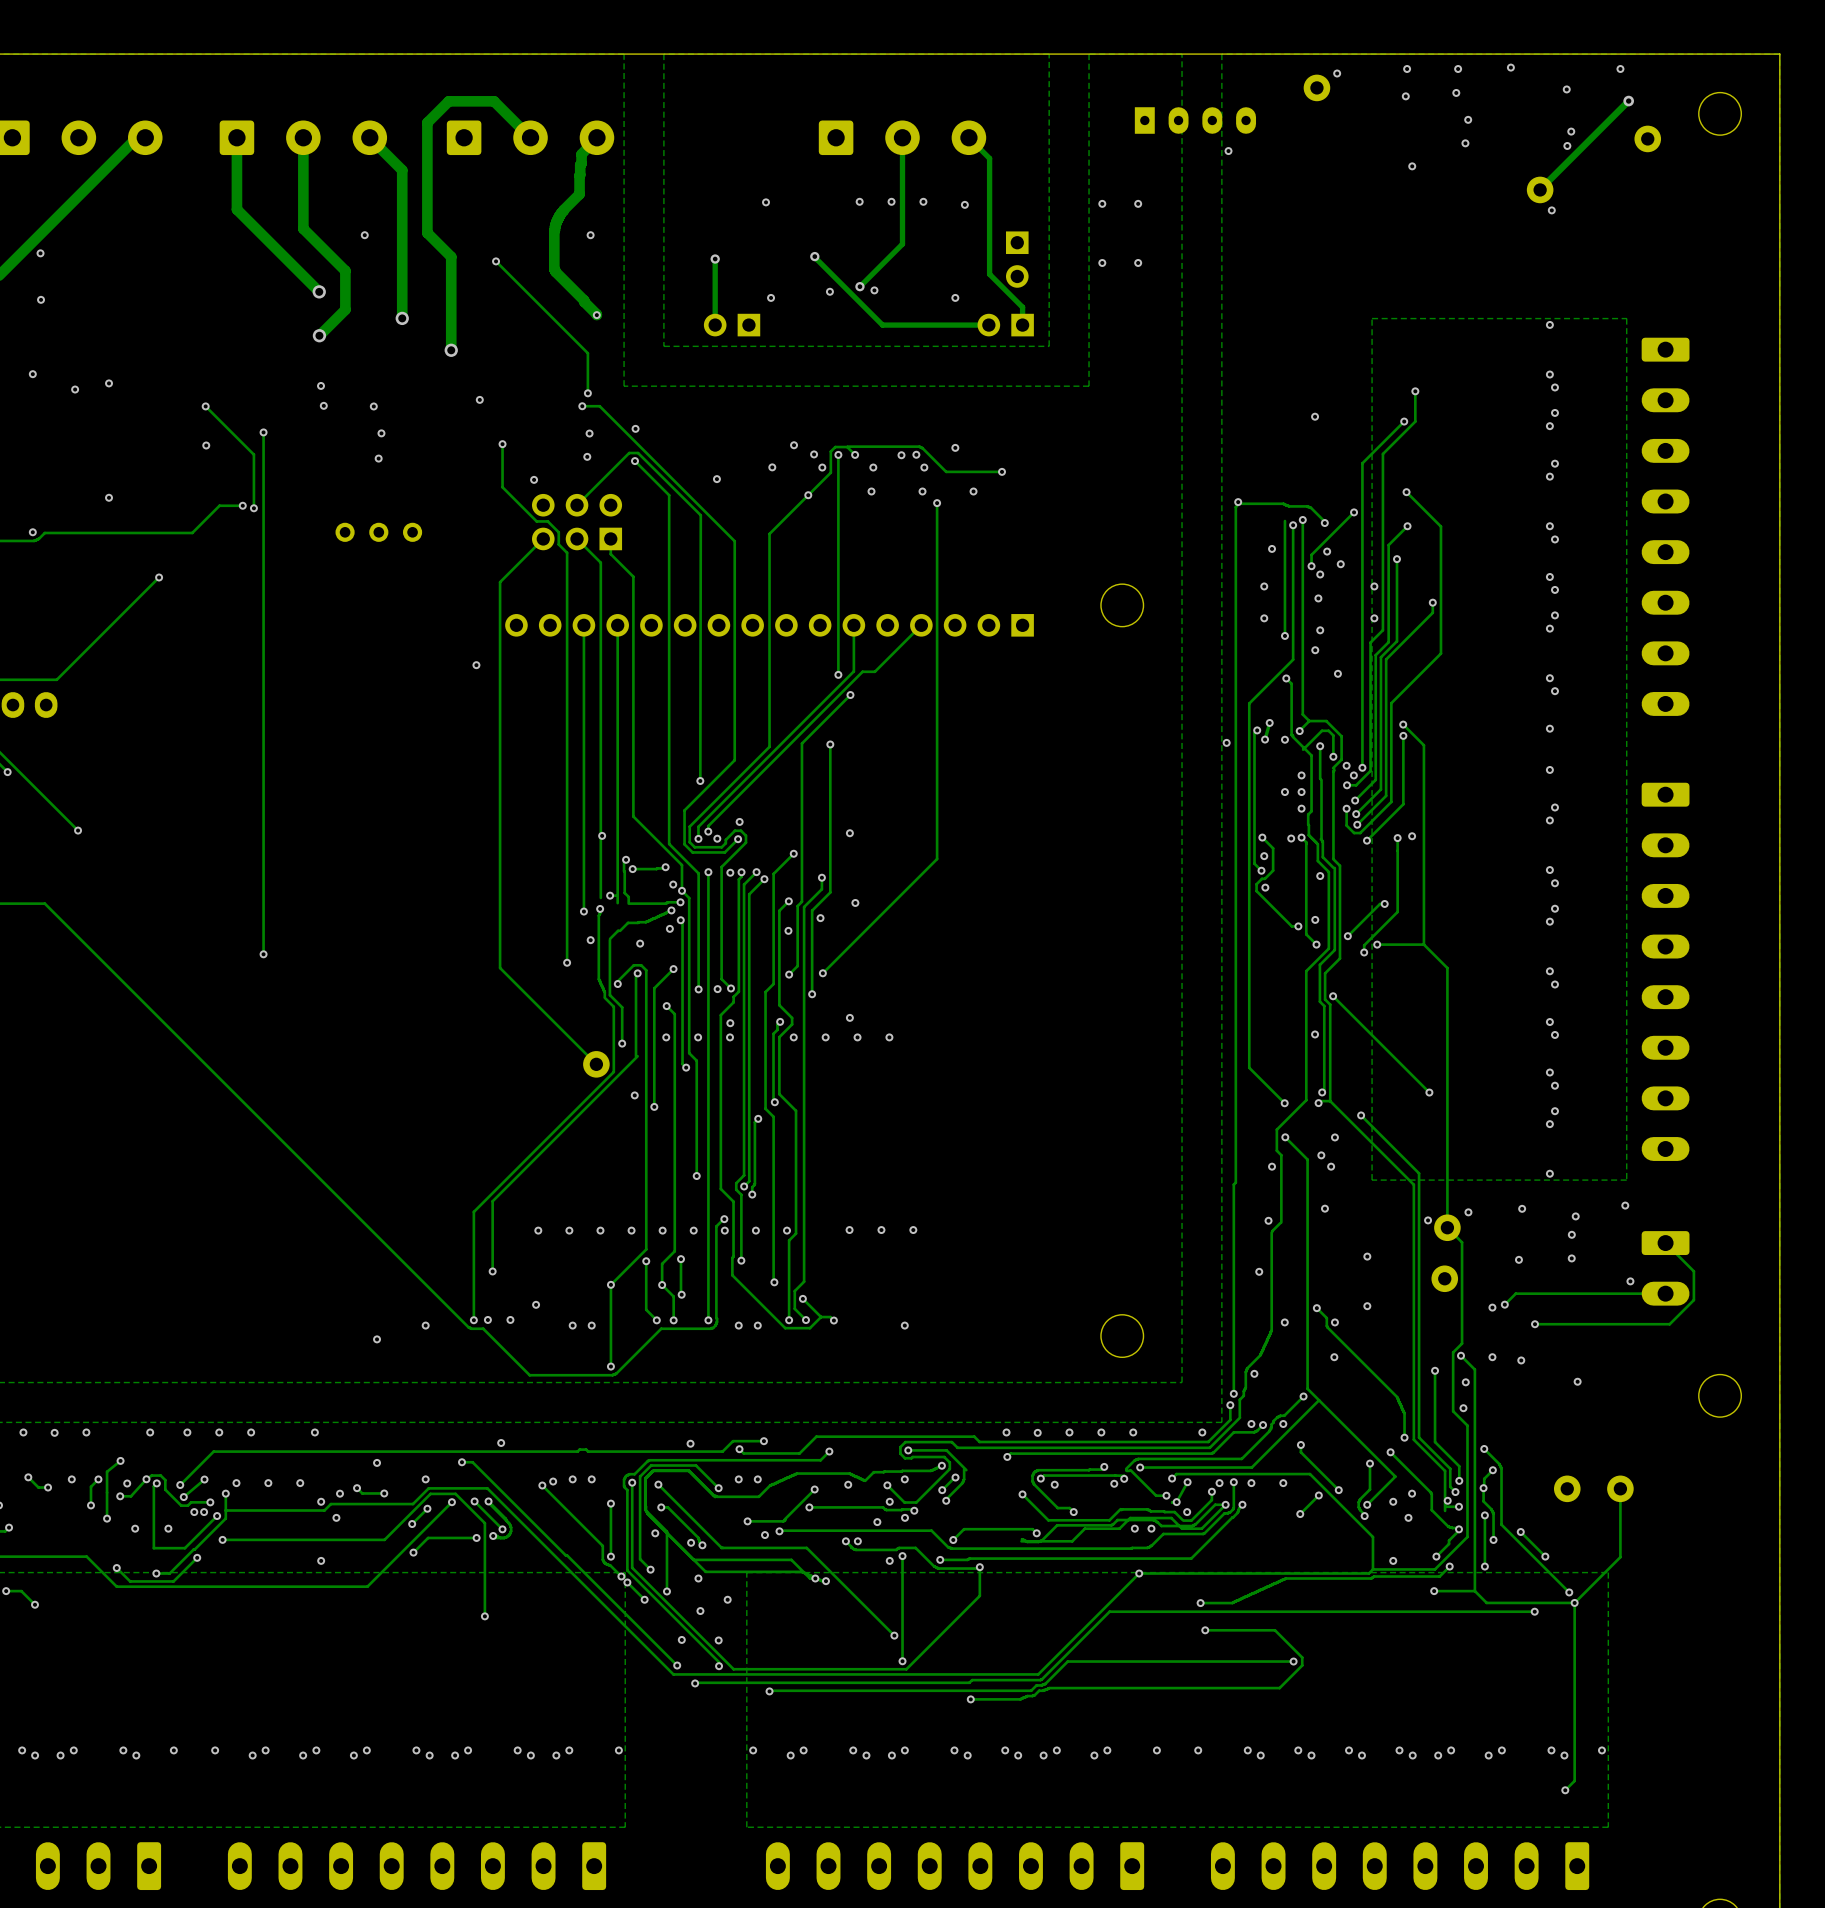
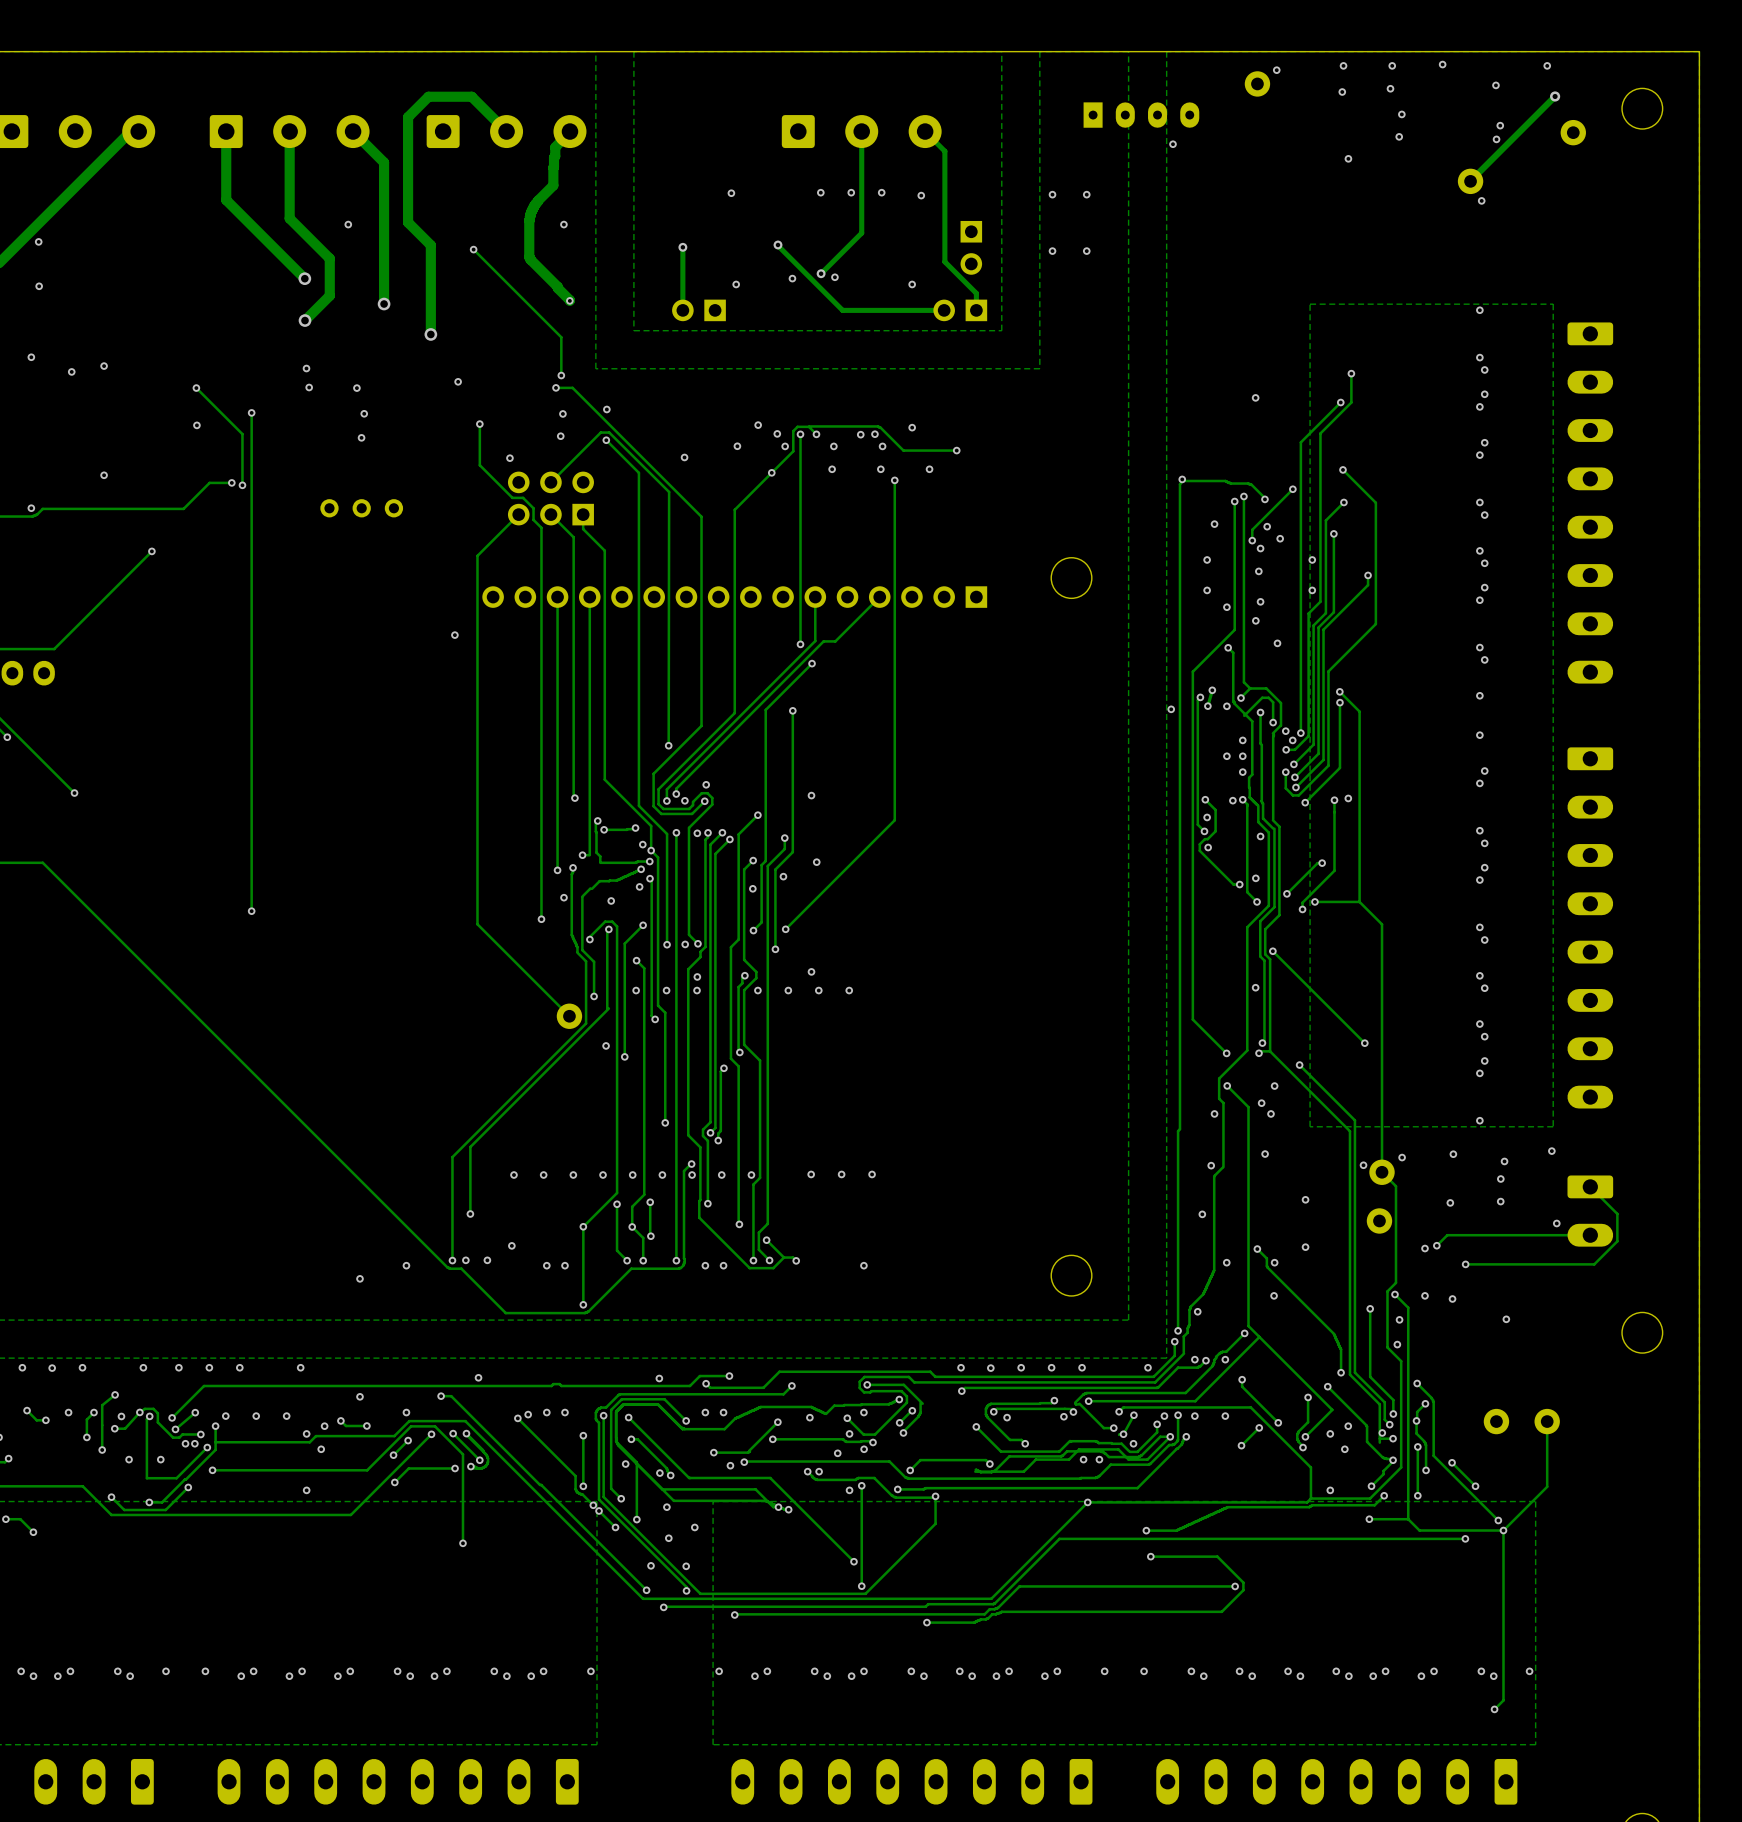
track: (1284, 521) (1284, 635) -> none
track: (600, 835) (600, 897) -> none
track: (617, 895) (617, 903) -> none

